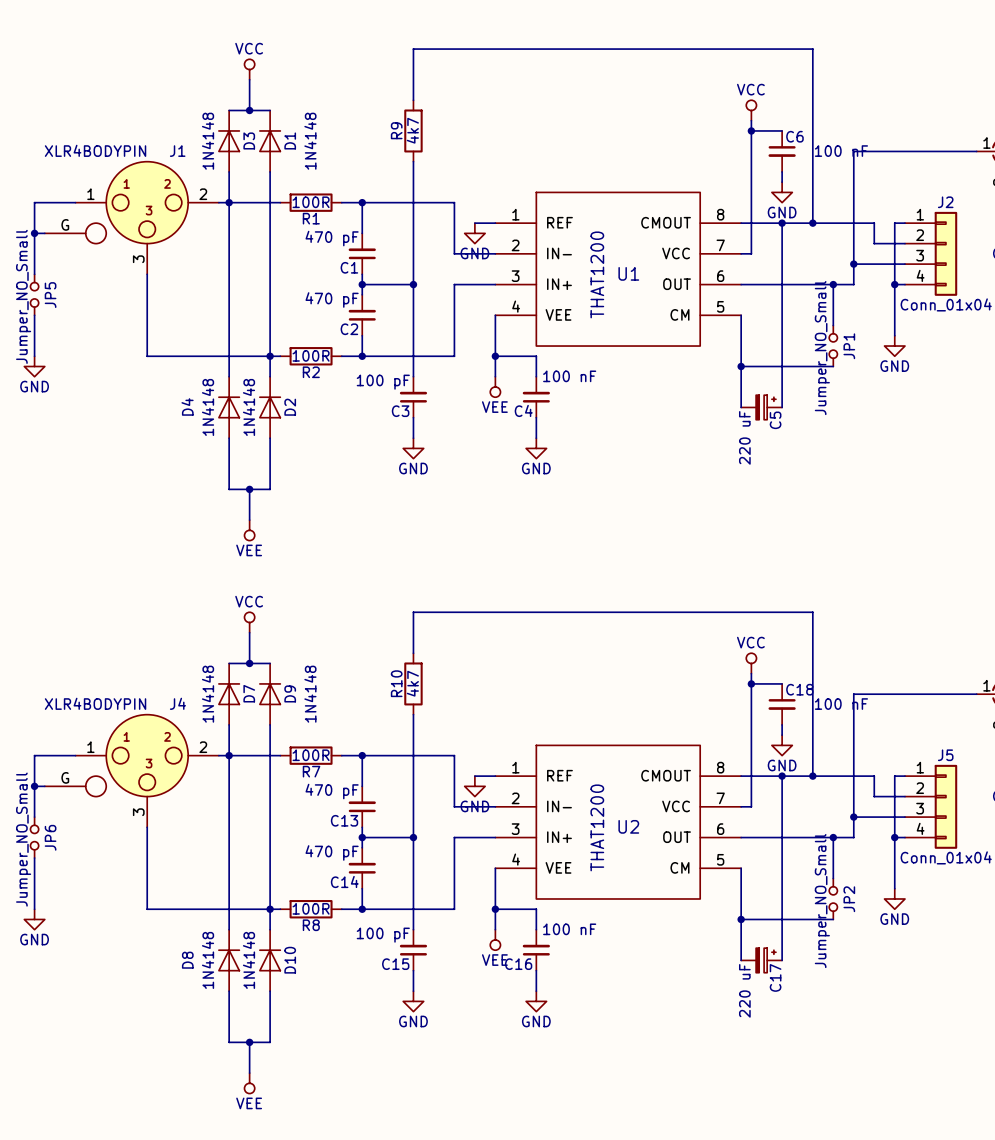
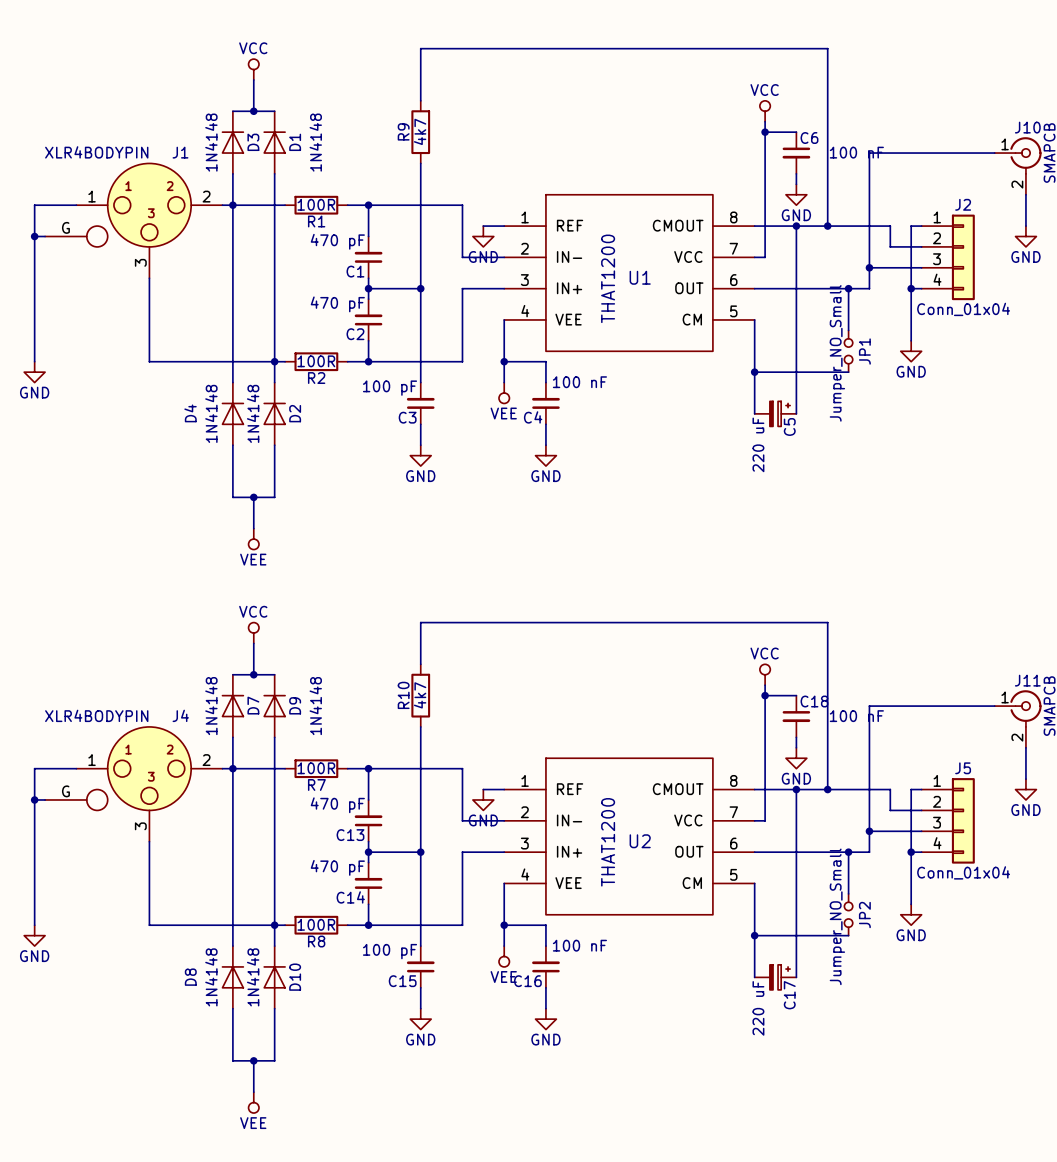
JP5: Jumper_NO_Small (34, 294) -> none
JP6: Jumper_NO_Small (34, 837) -> none

